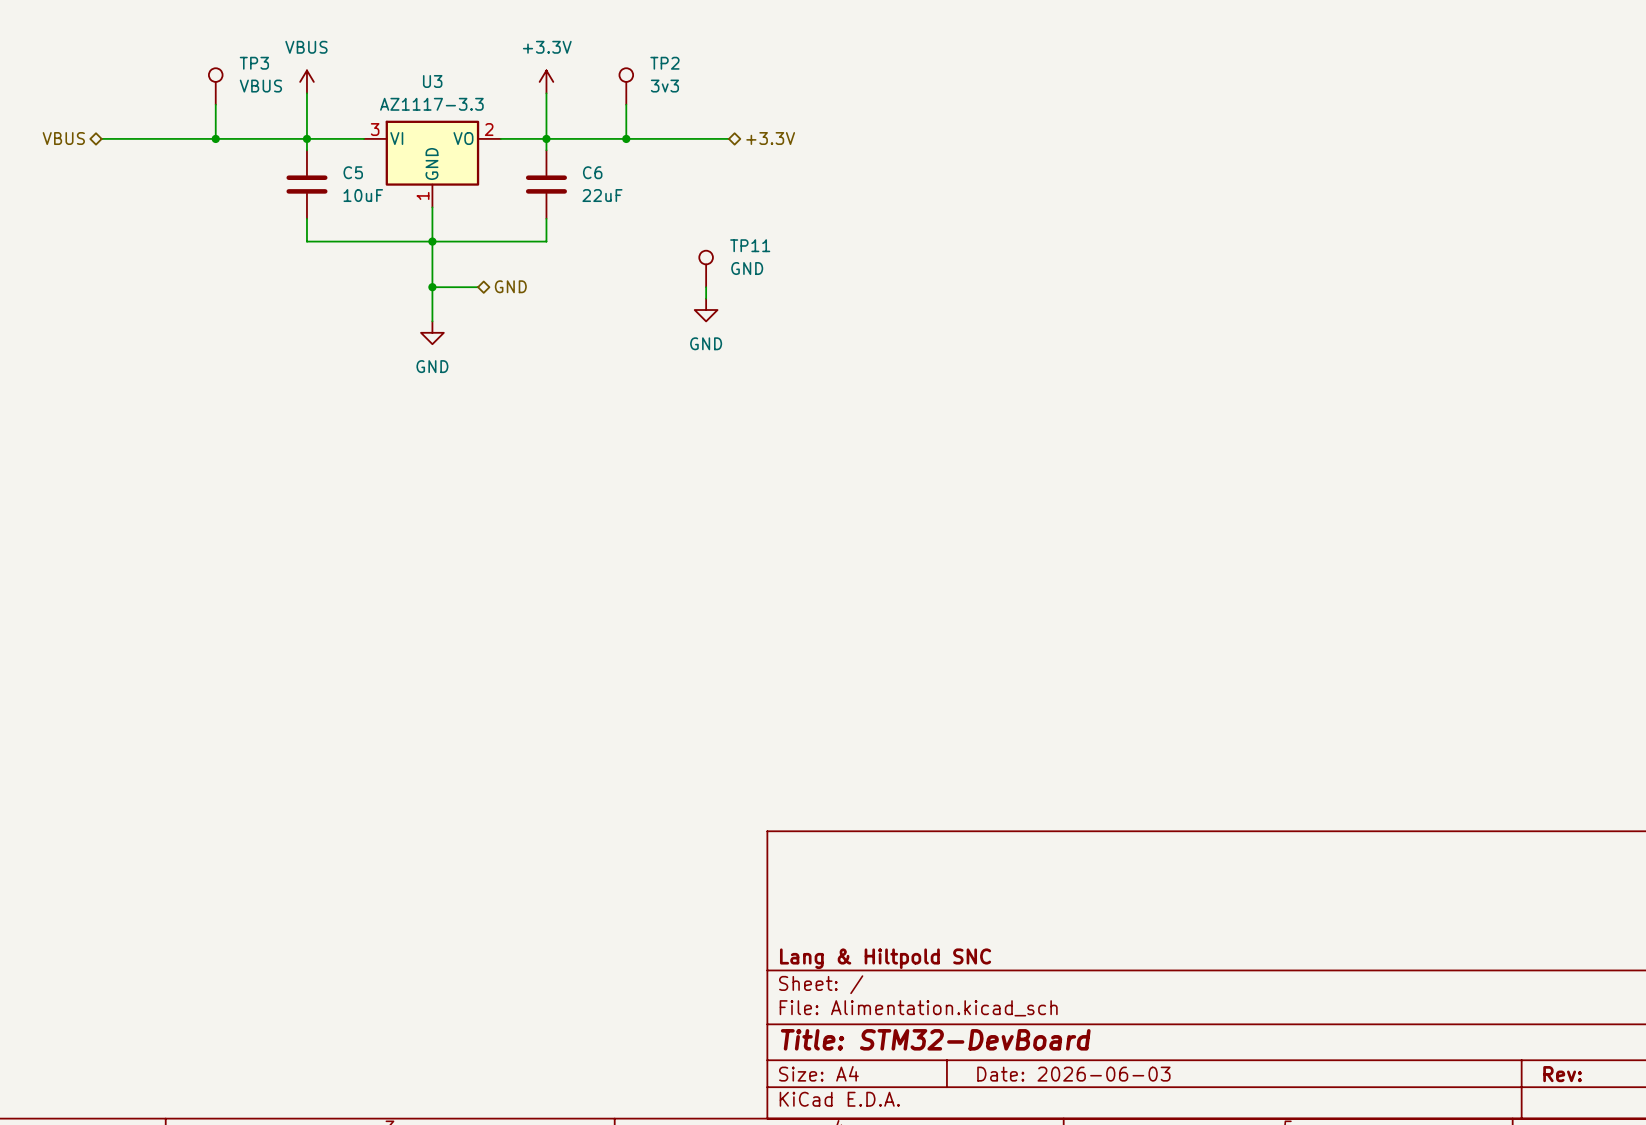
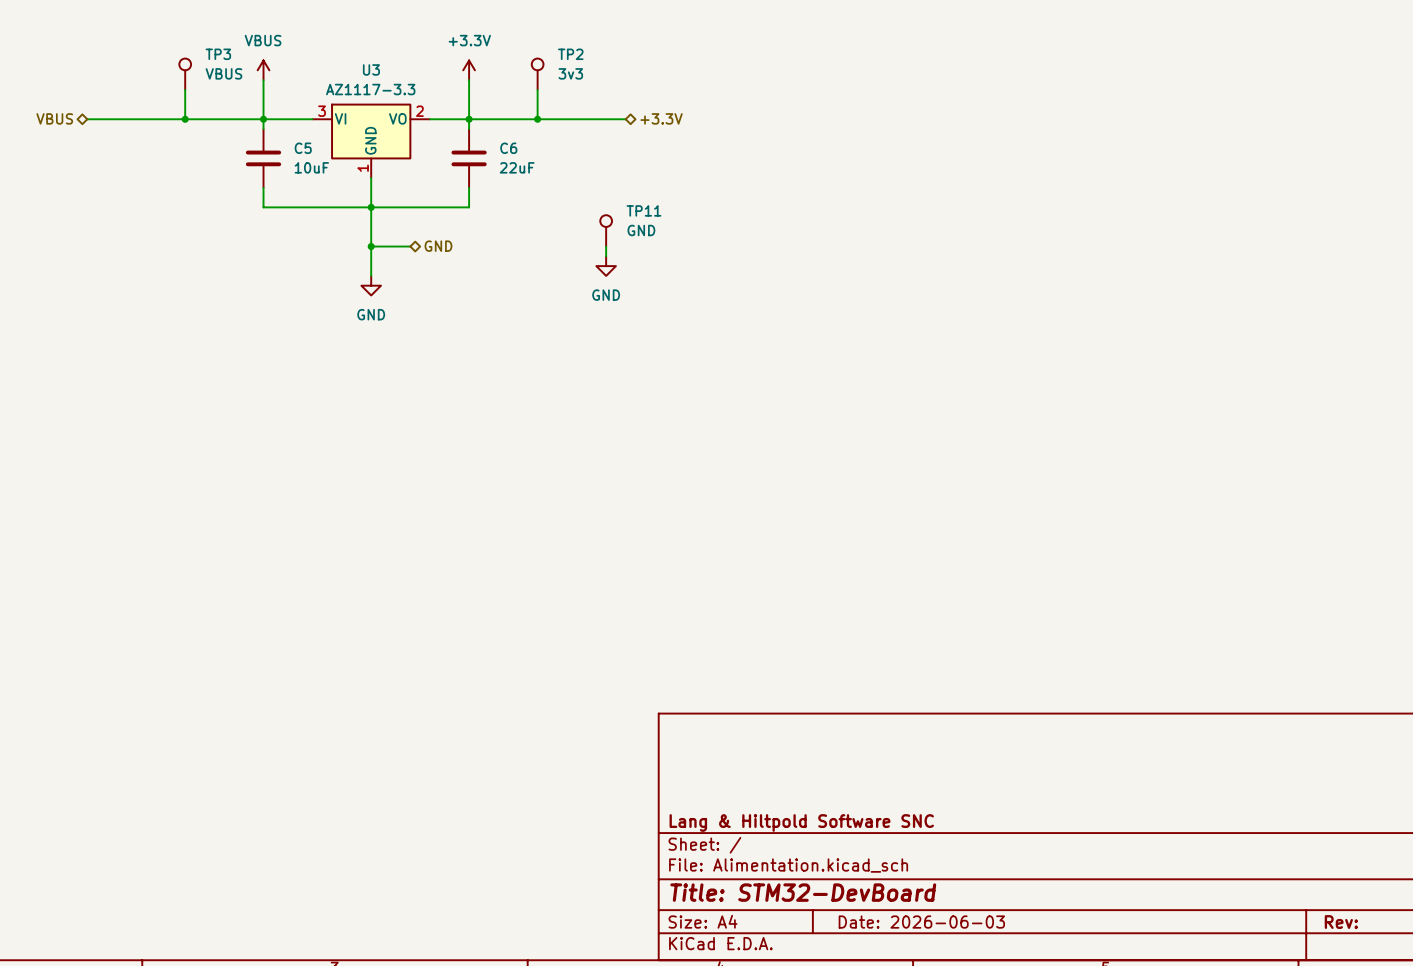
title block: Lang & Hiltpold SNC (885, 958) -> Lang & Hiltpold Software SNC (801, 822)

